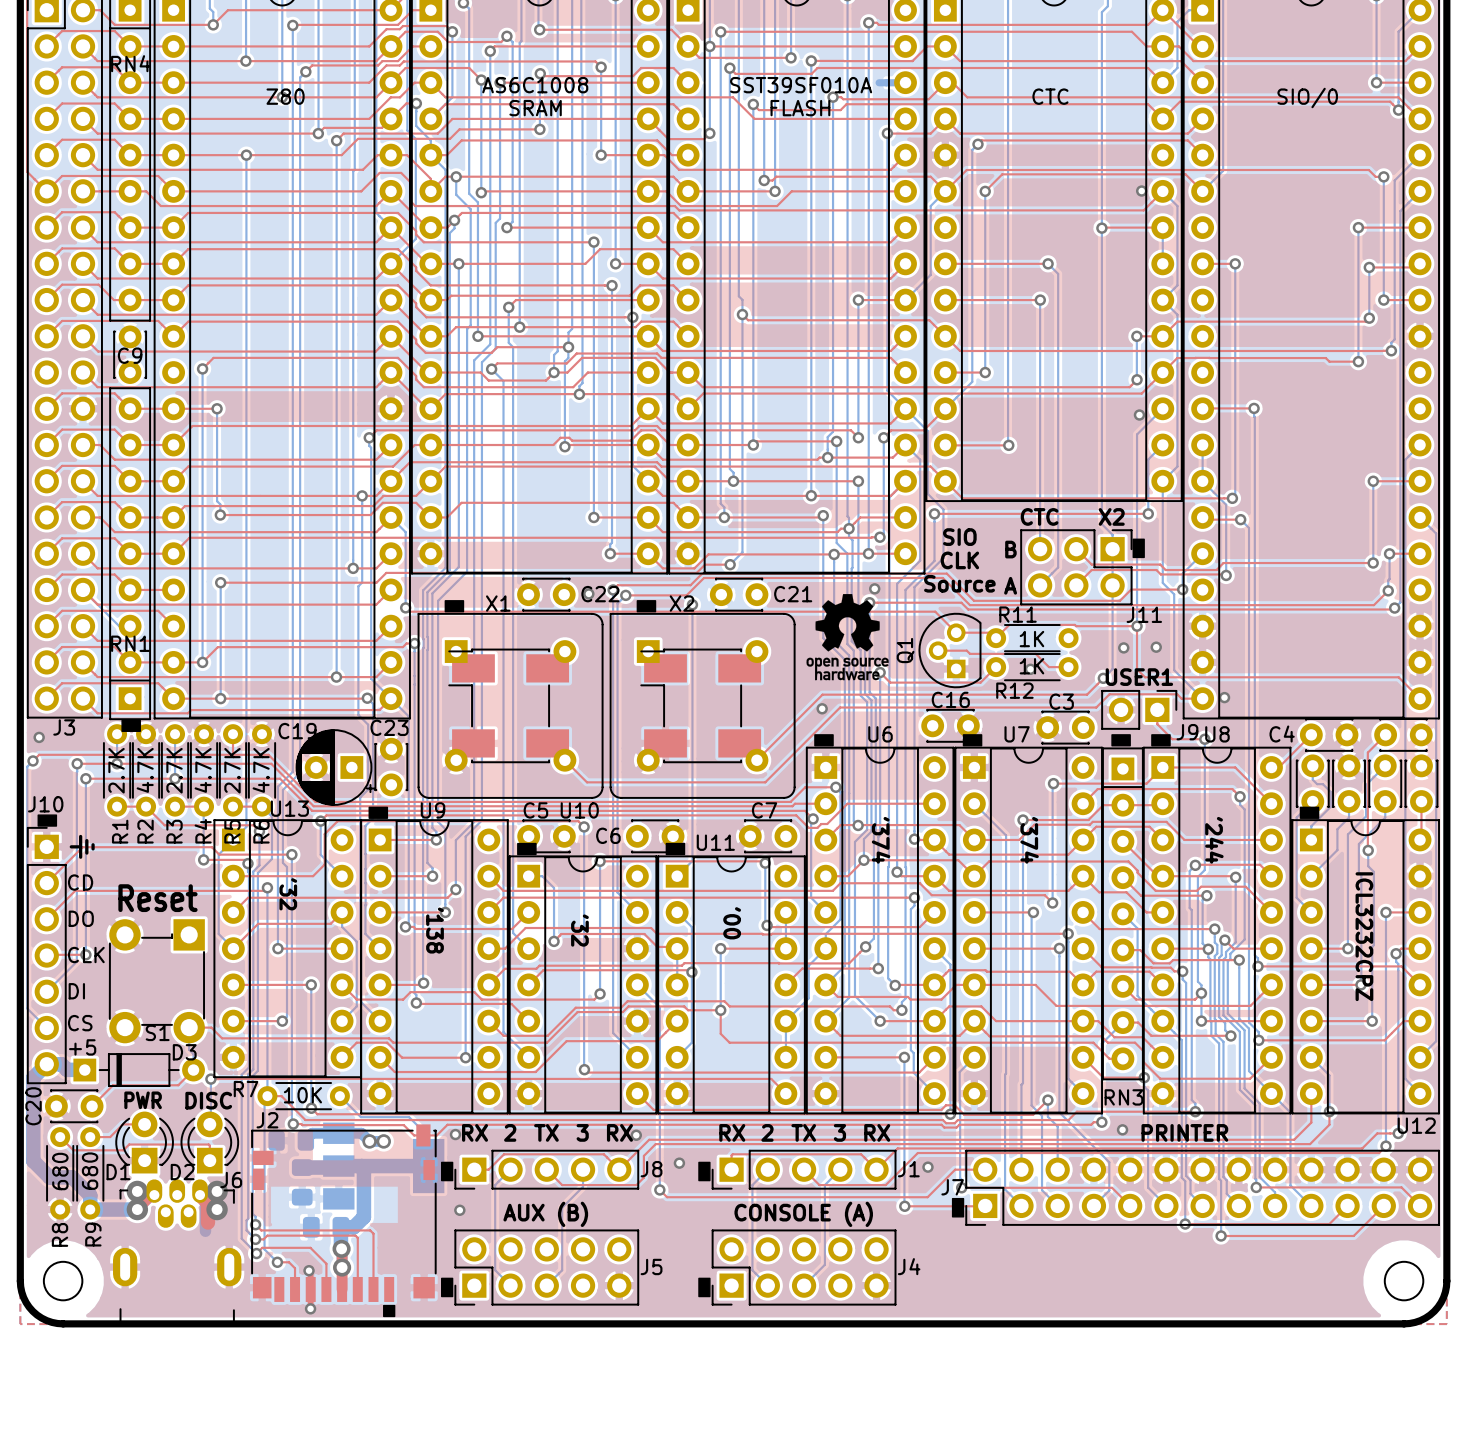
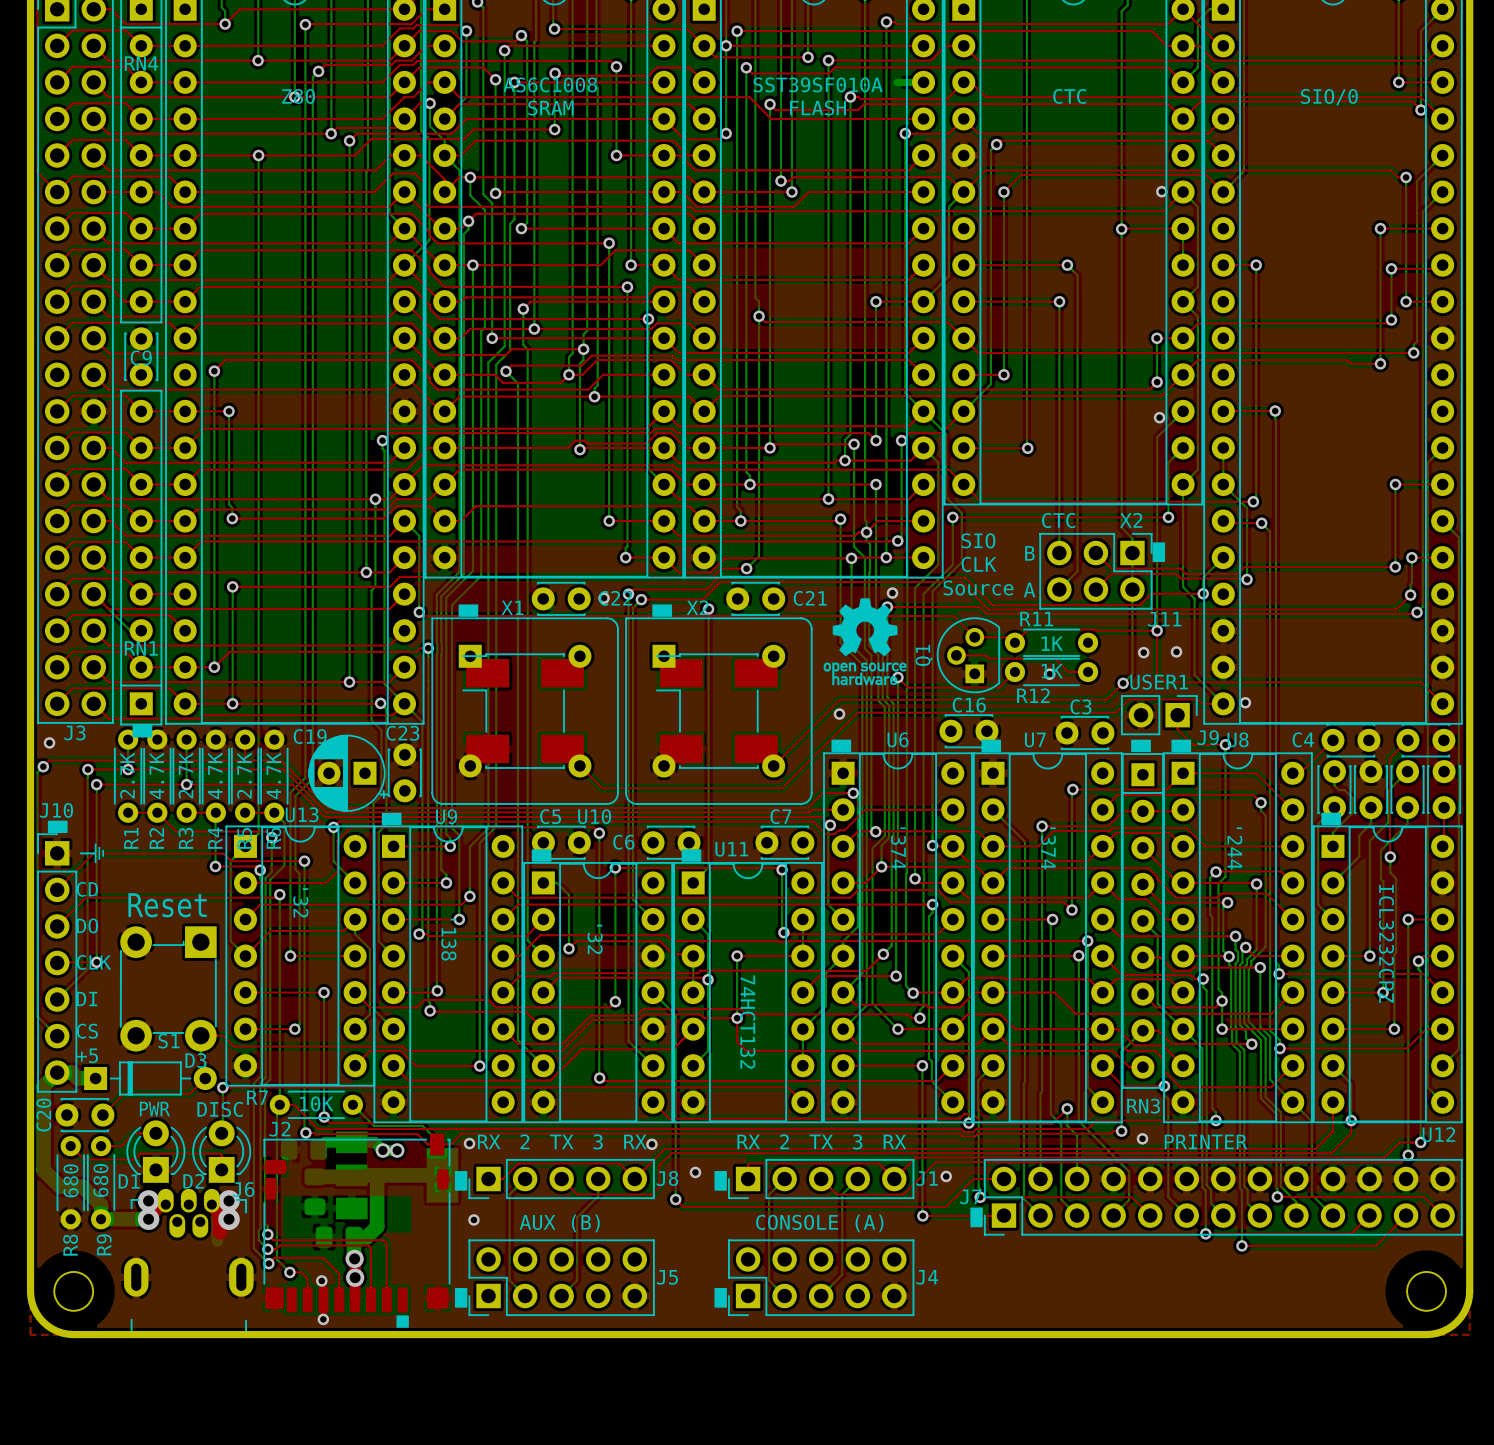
text: '00 (732, 923) -> none
text: none -> 74HCT132 (747, 1022)

